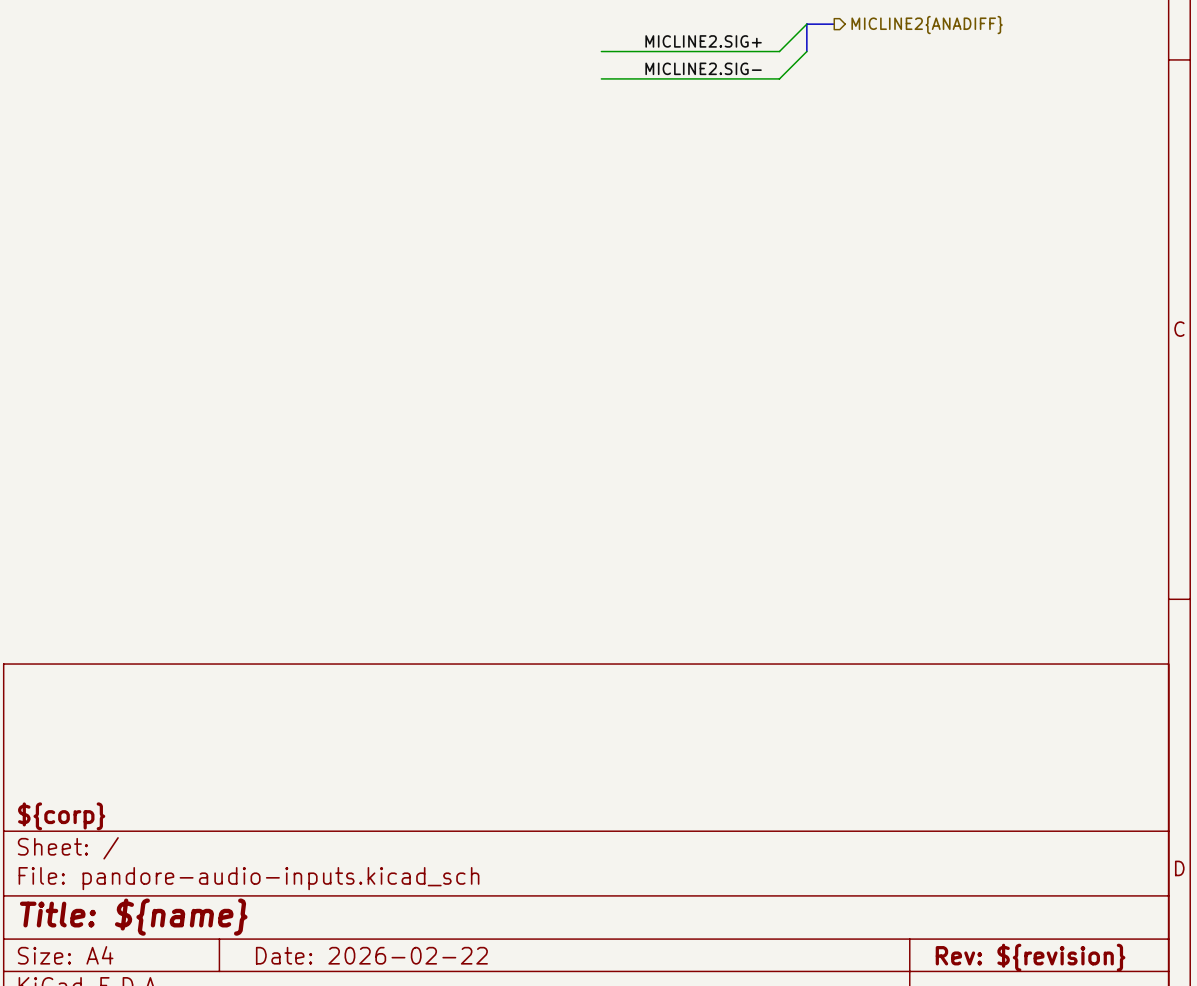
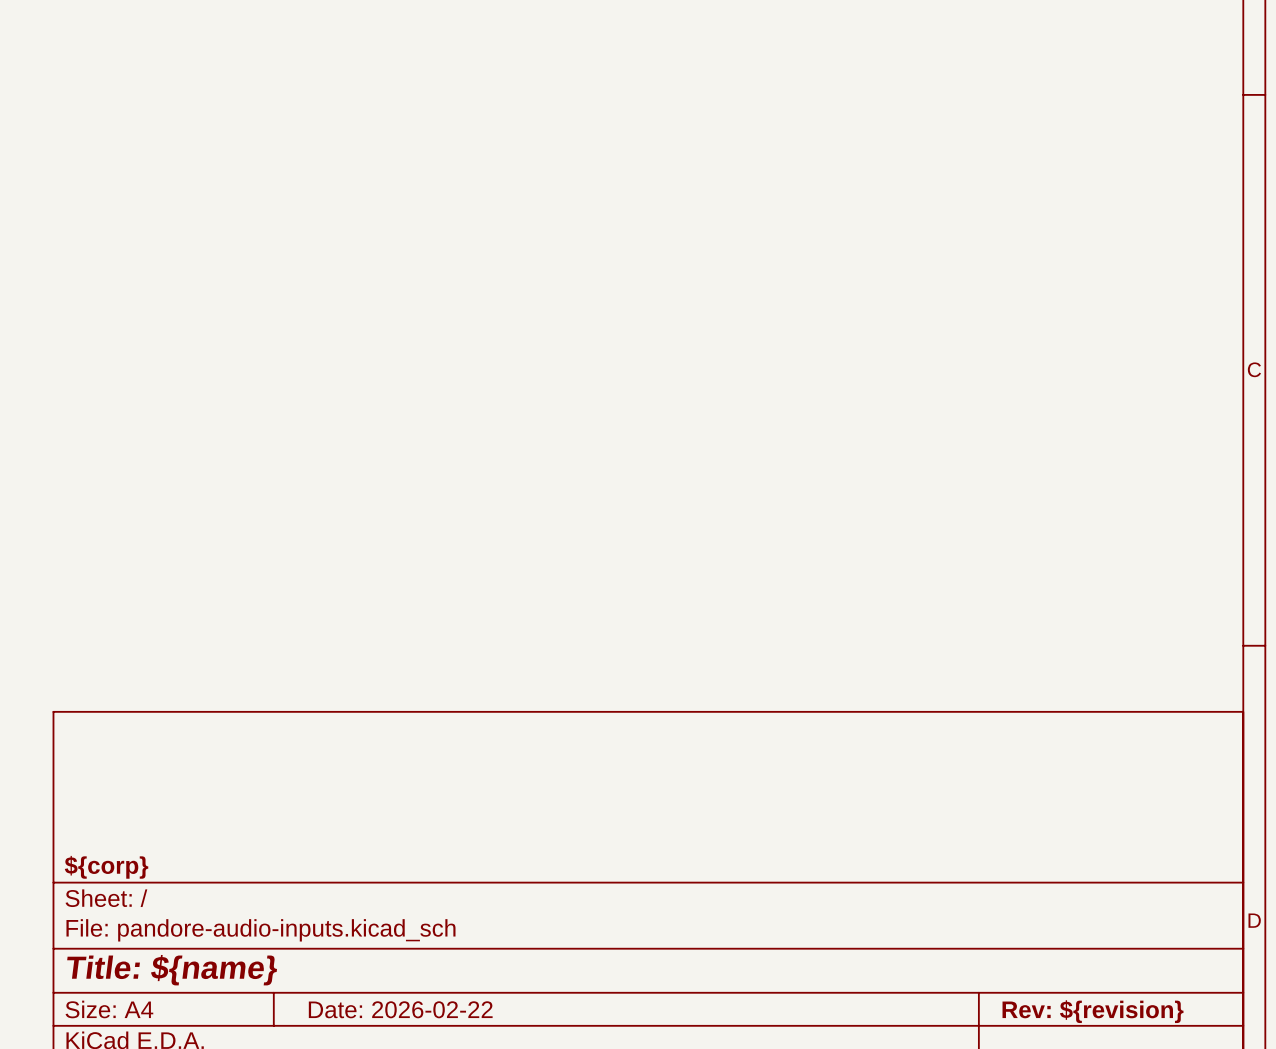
wire: (806, 24) (779, 51) (601, 51) -> none
bus: (834, 24) (806, 24) (806, 51) -> none
hierarchical label: MICLINE2{ANADIFF} (927, 25) -> none
label: MICLINE2.SIG+ (703, 41) -> none
wire: (806, 51) (779, 78) (601, 78) -> none
label: MICLINE2.SIG- (703, 68) -> none

